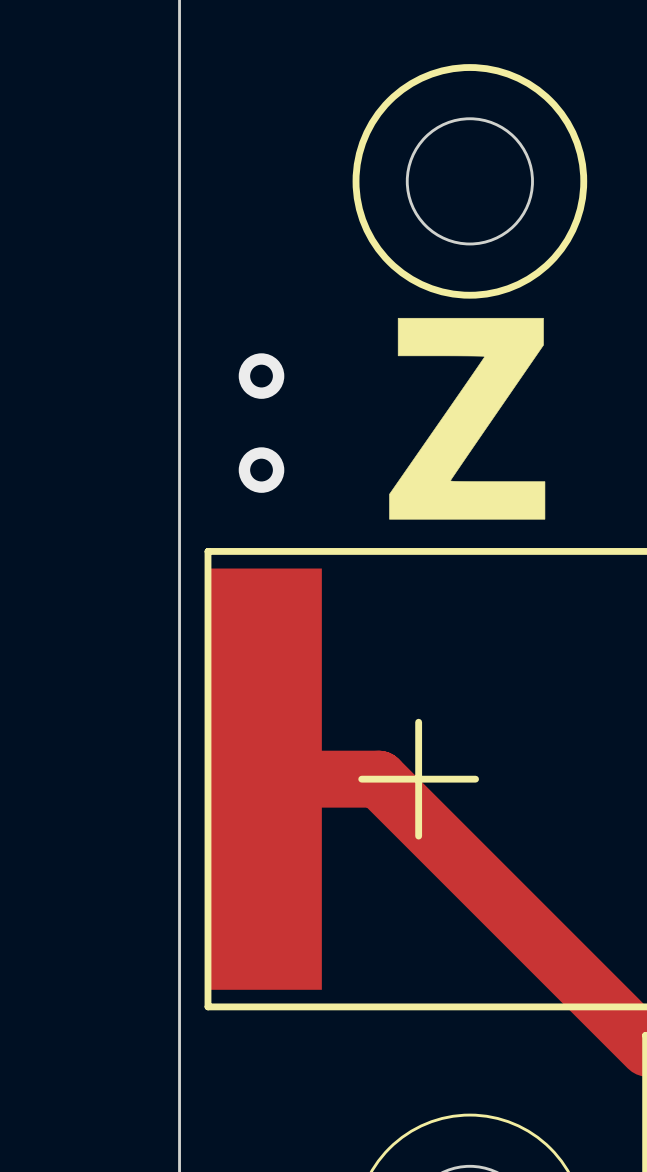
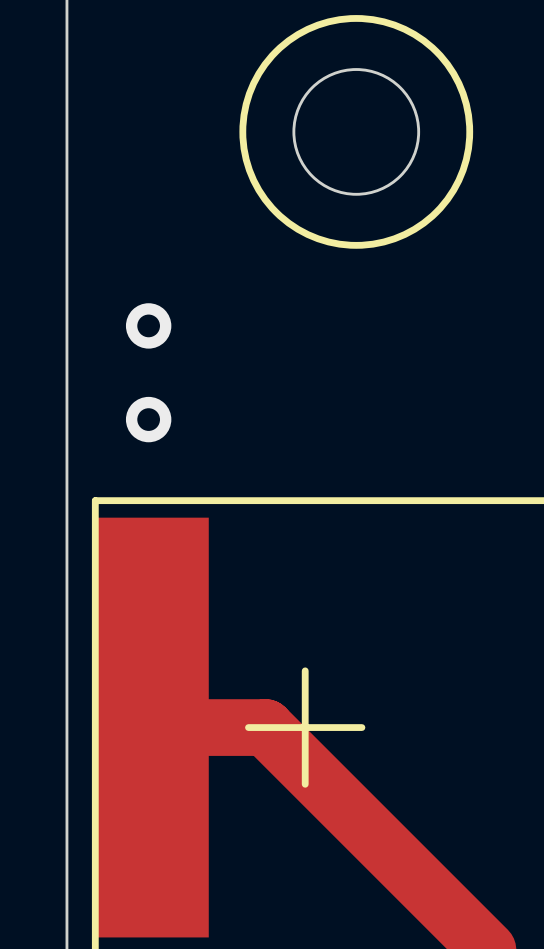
drawing: [389, 317, 546, 520] -> none

